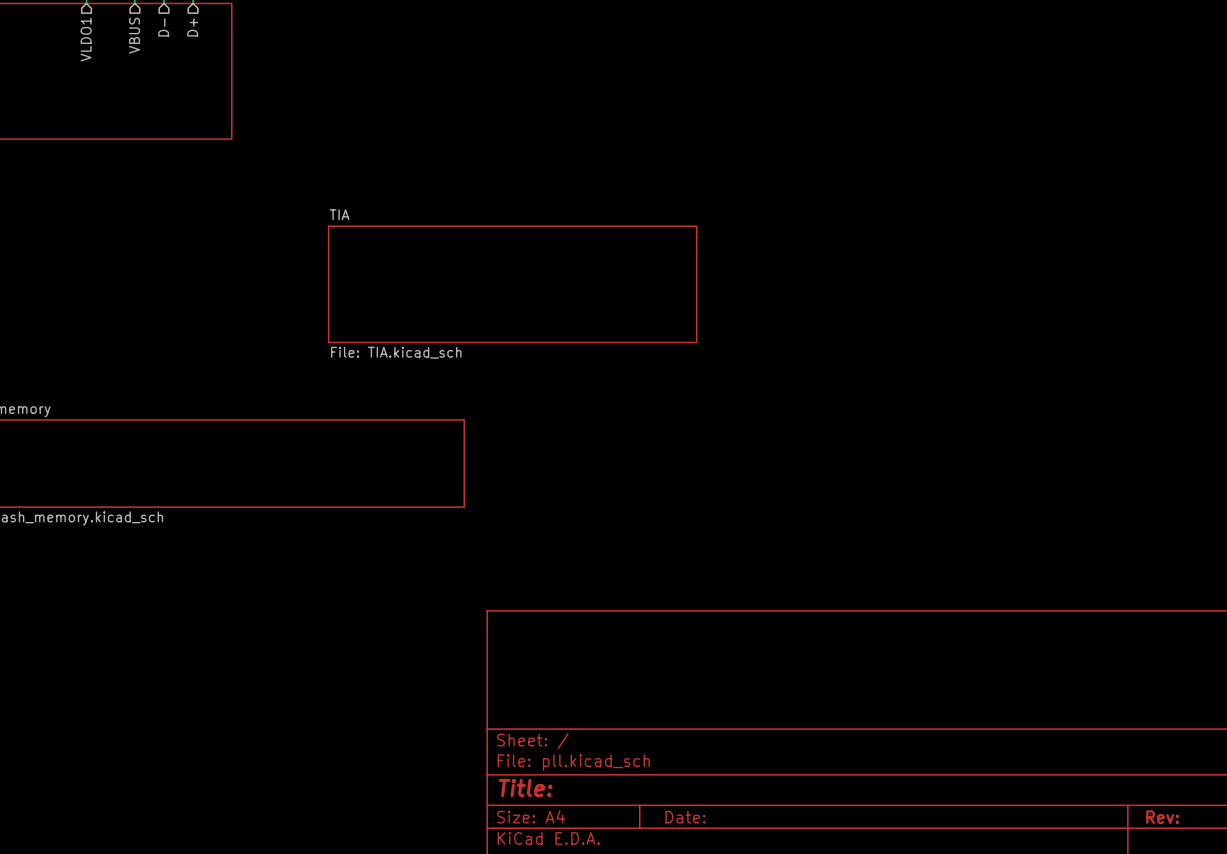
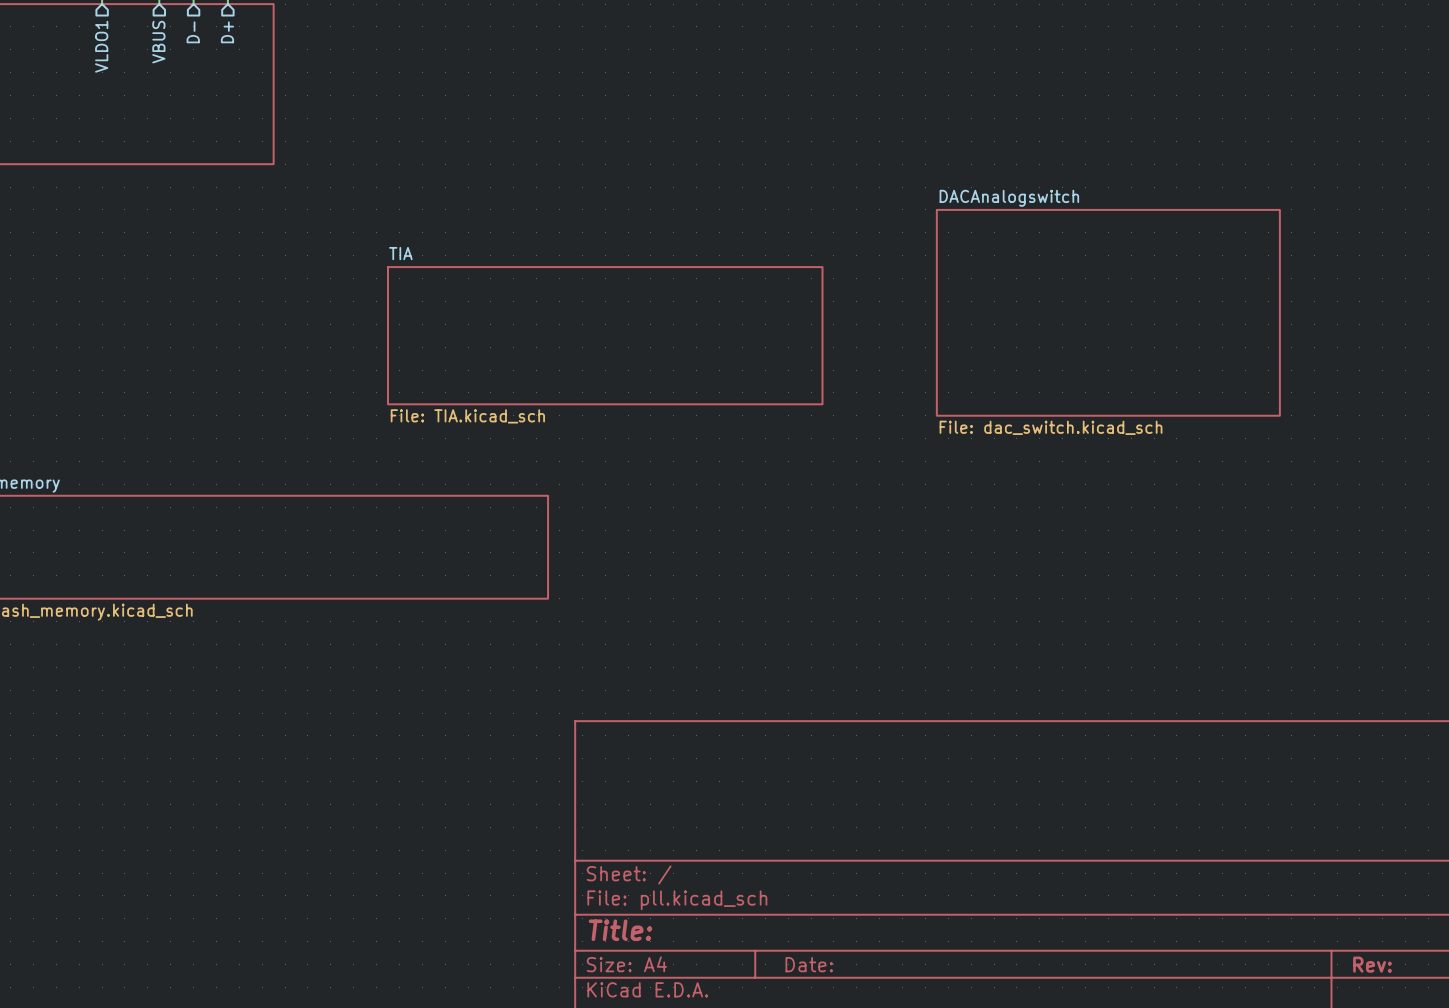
sheet DACAnalogswitch: none -> File: dac_switch.kicad_sch (1108, 312)

